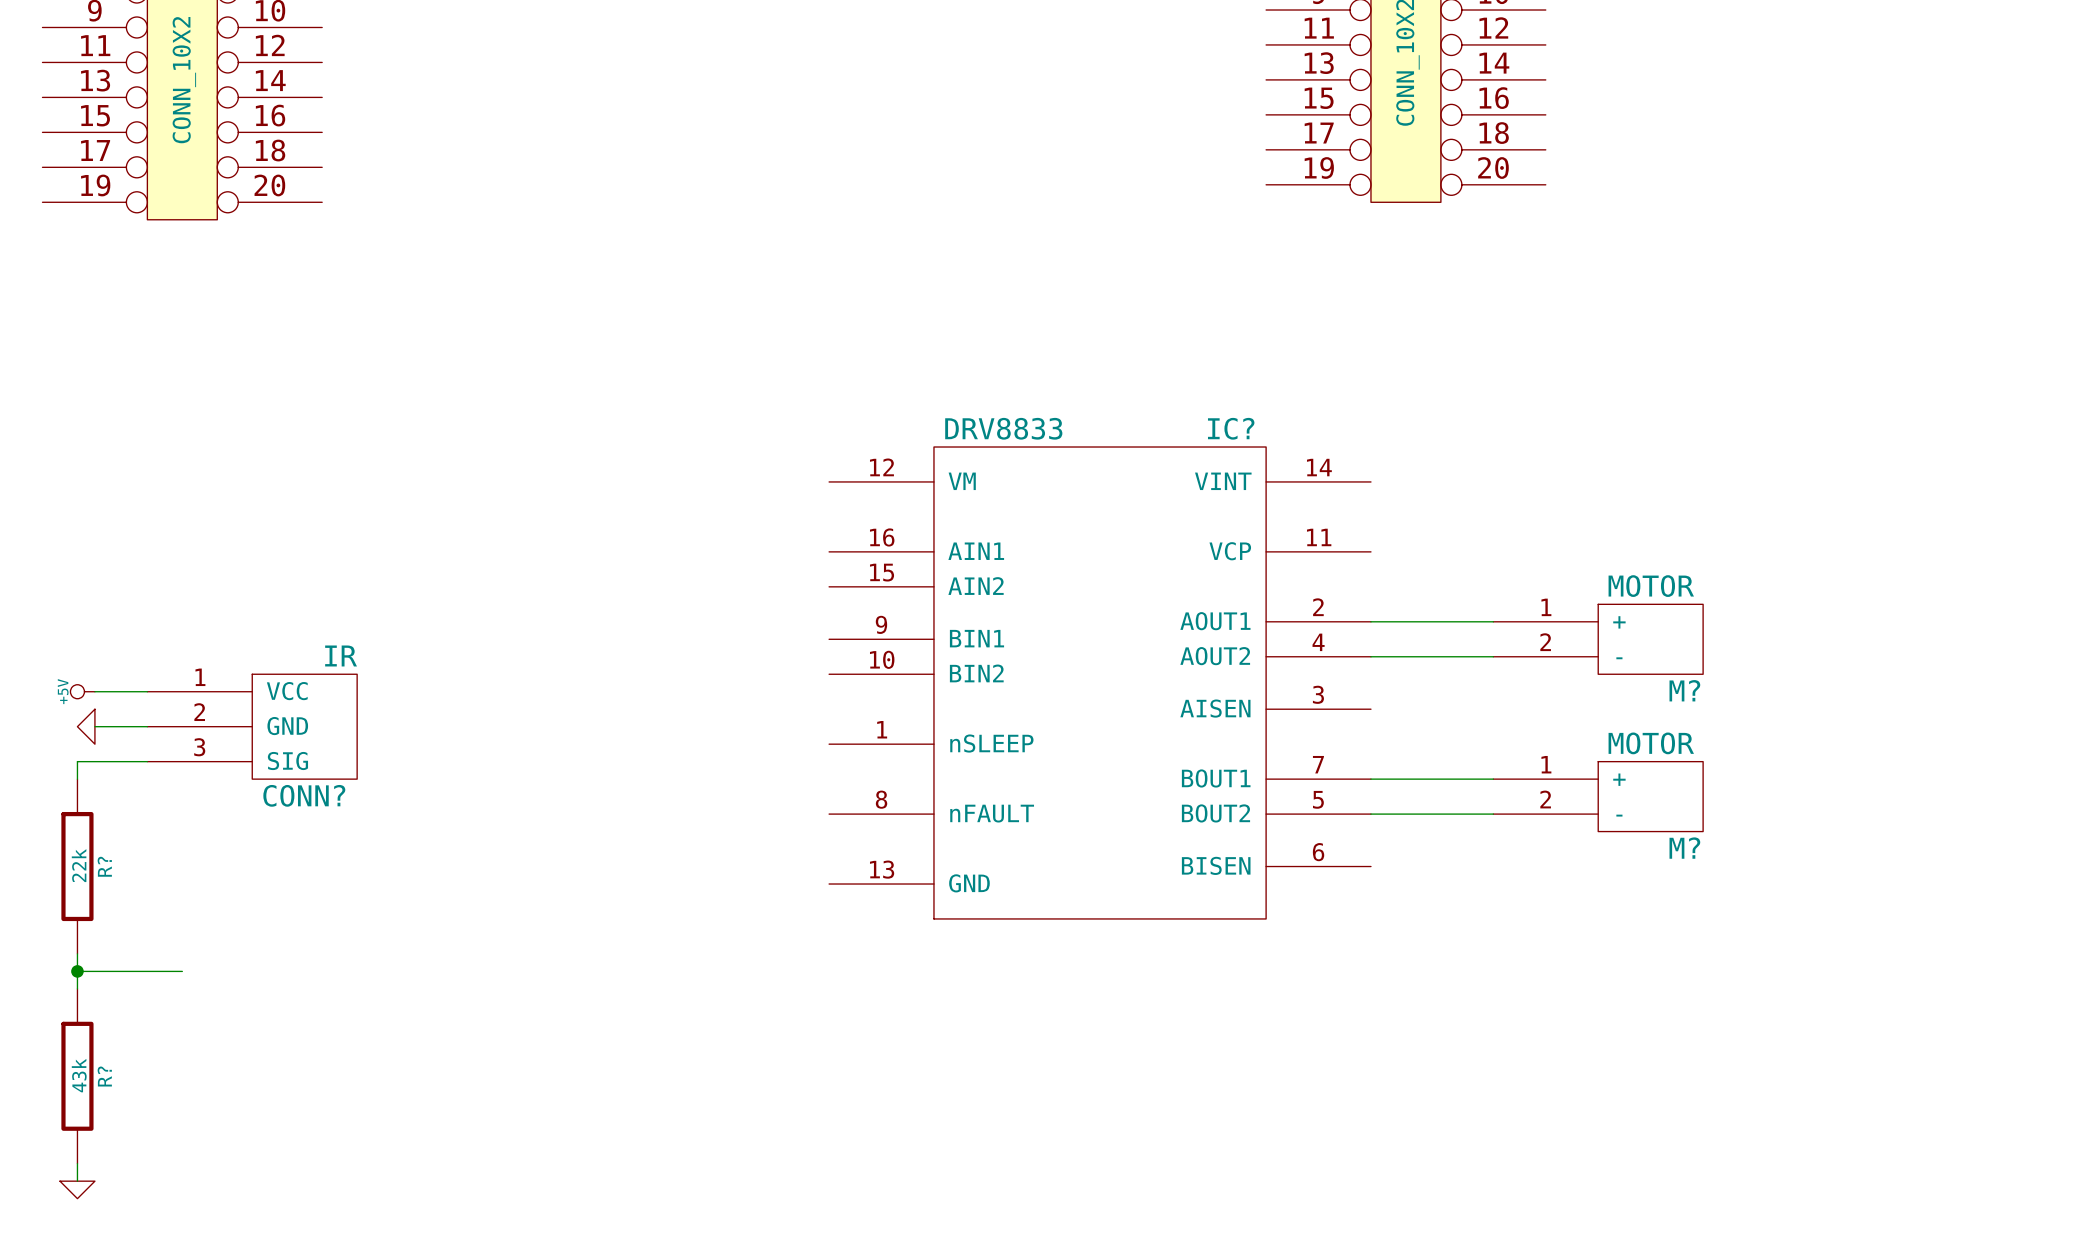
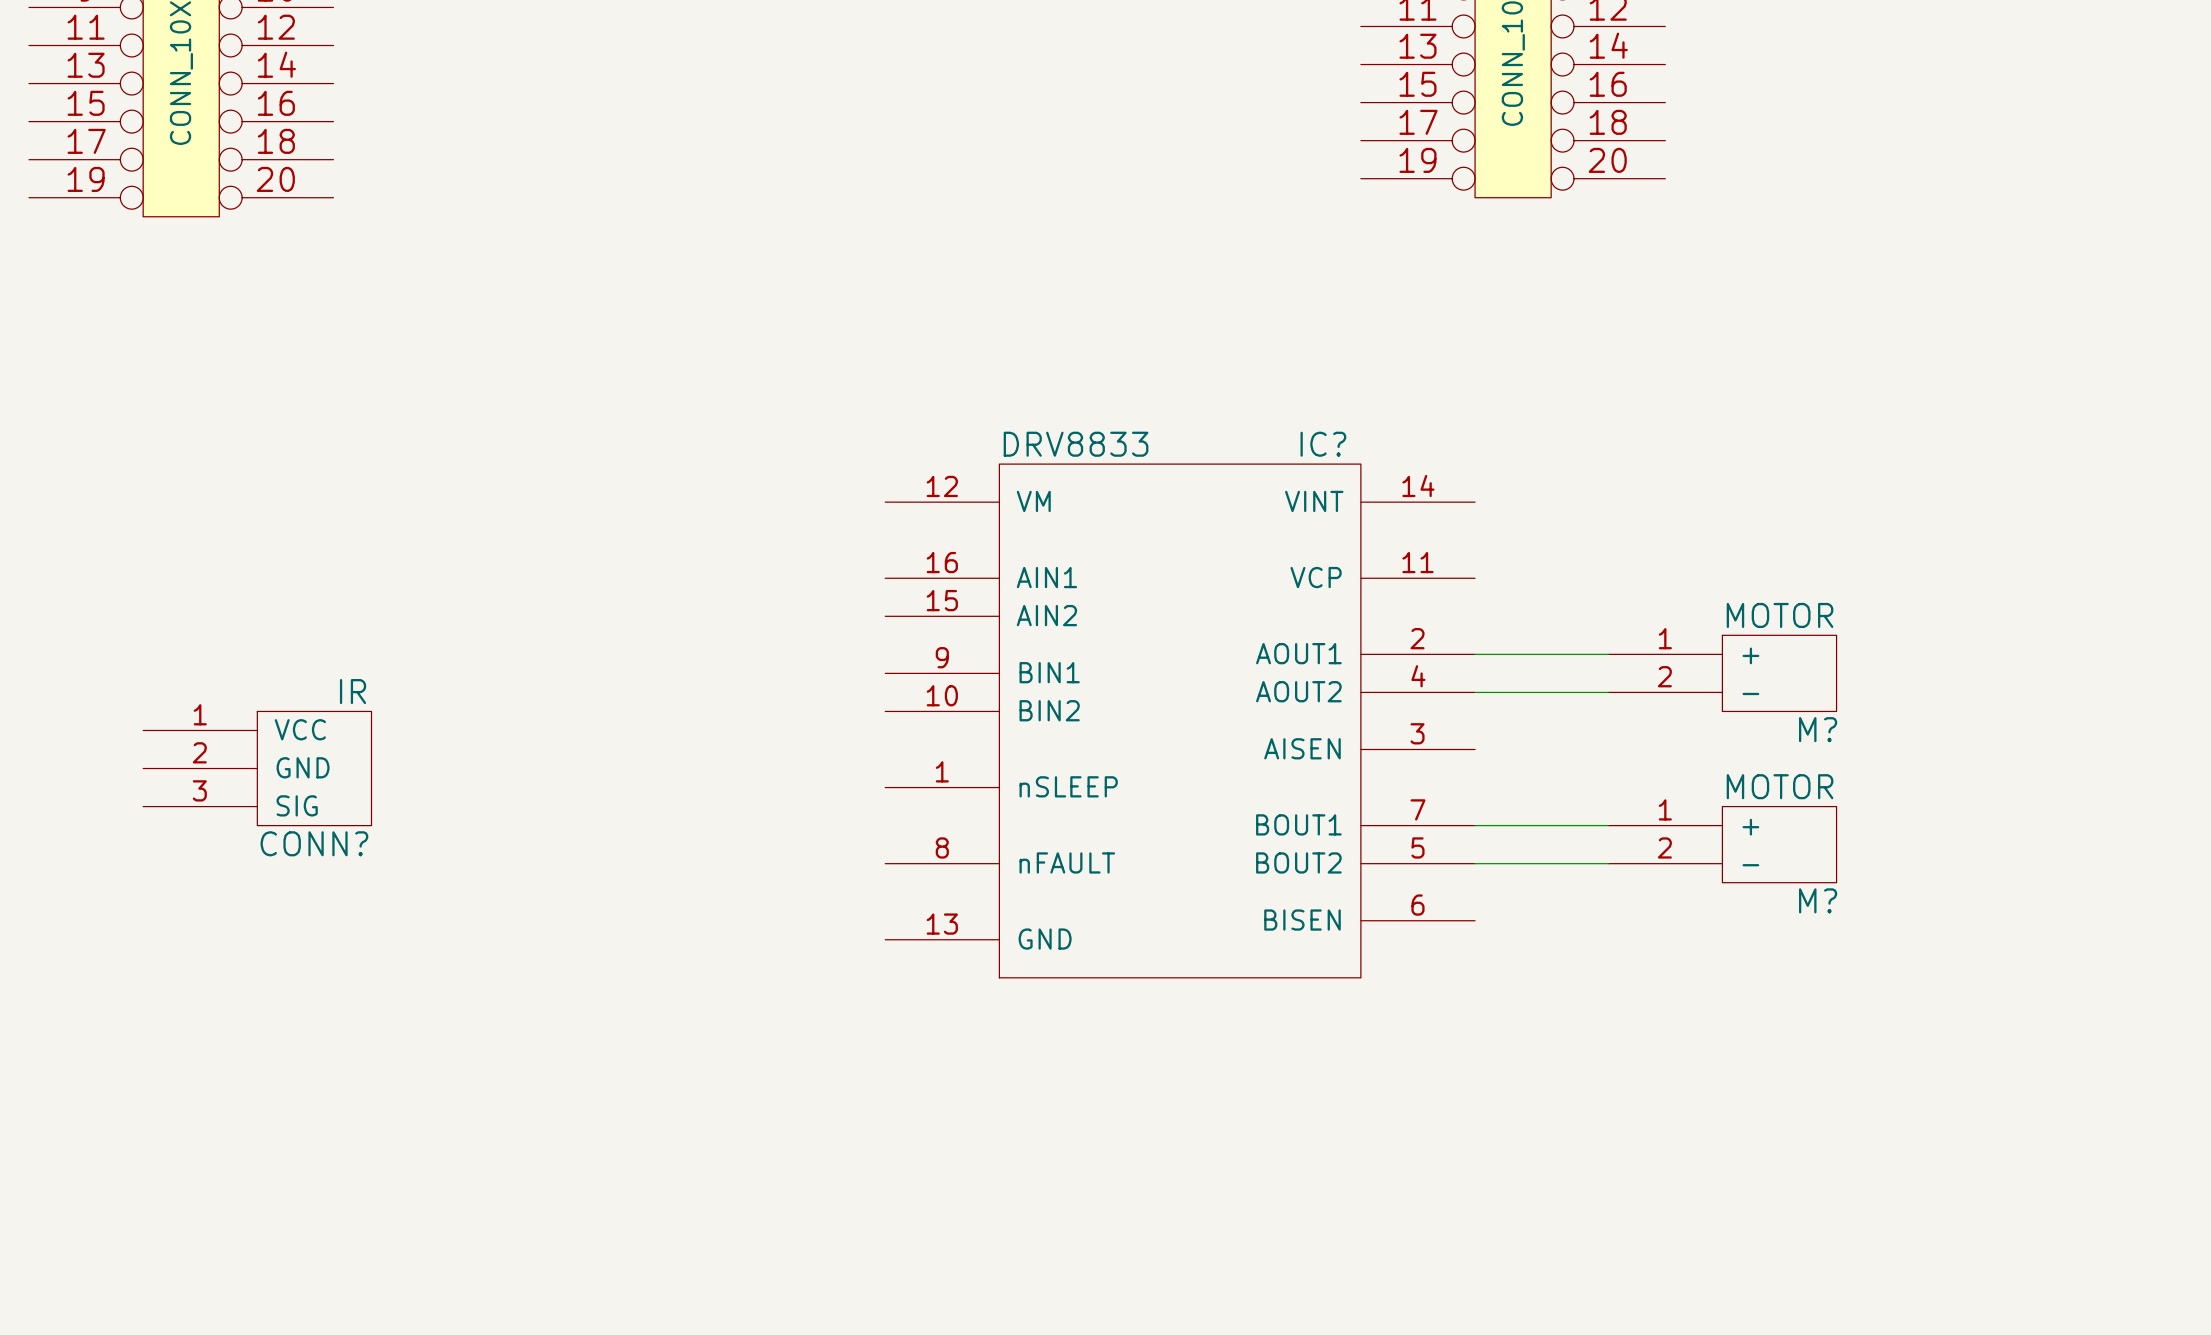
power symbol: +5V (82, 691) -> none
wire: (94, 691) (147, 691) -> none
power symbol: (86, 726) -> none
wire: (94, 726) (147, 726) -> none
wire: (147, 761) (77, 761) (77, 779) -> none
R?: 22k (77, 866) -> none
wire: (77, 953) (77, 988) -> none
wire: (77, 971) (182, 971) -> none
junction: (77, 971) -> none
R?: 43k (77, 1076) -> none
wire: (77, 1163) (77, 1181) -> none
power symbol: (77, 1189) -> none

